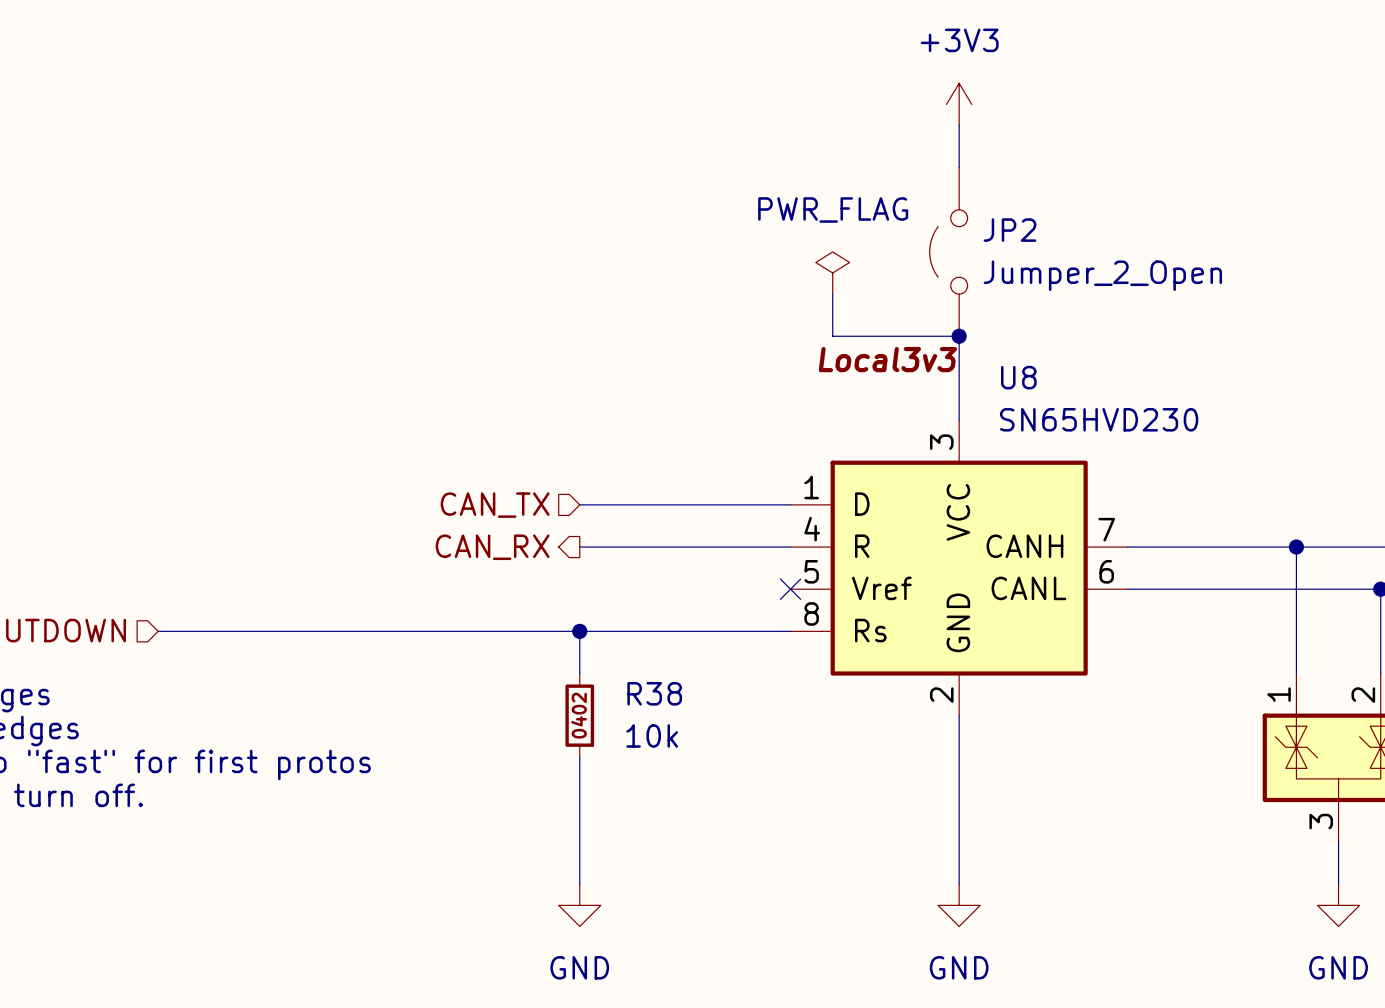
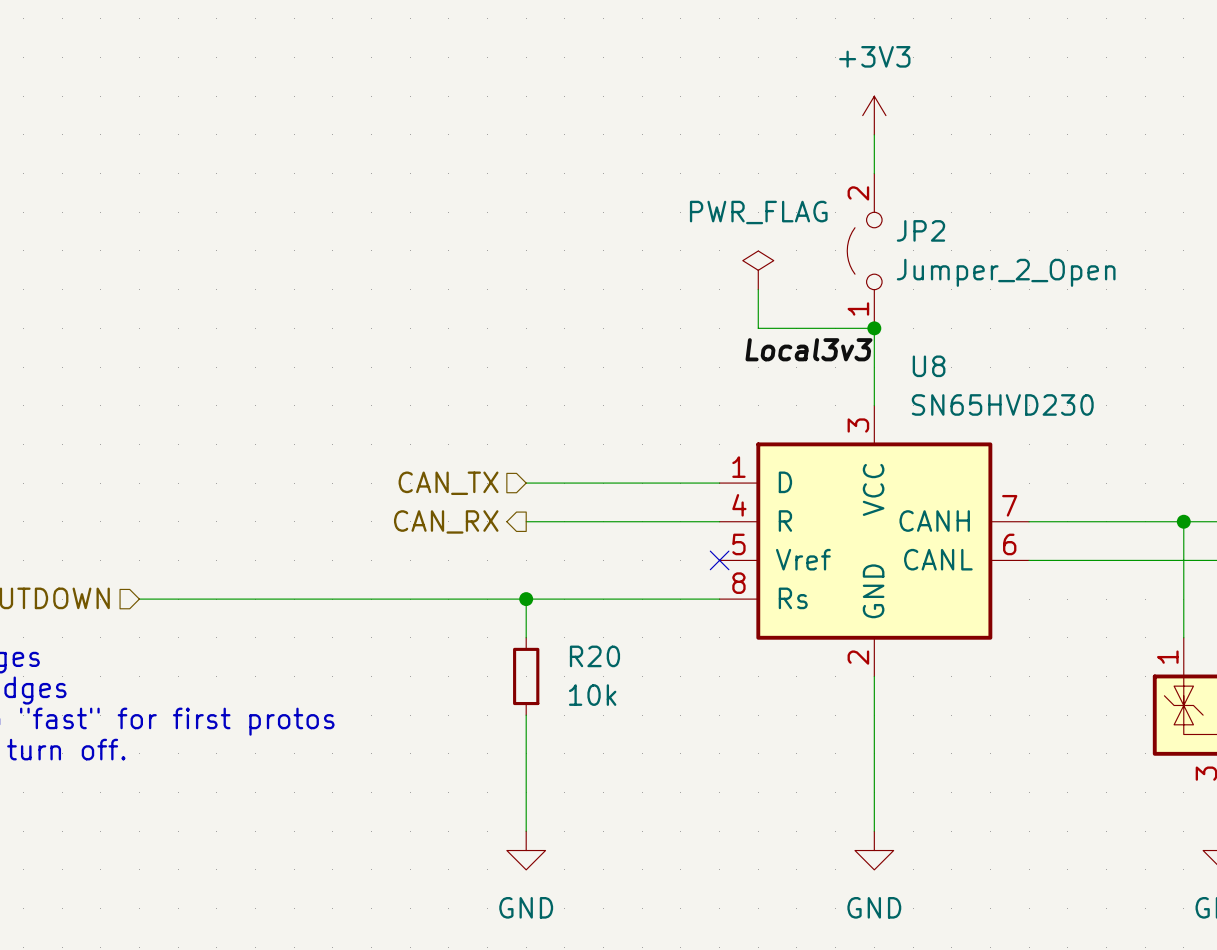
JP2 pin number: none -> 2 (858, 193)
JP2 pin number: none -> 1 (858, 308)
R38 name: R38 (654, 693) -> R20 (594, 656)
R38 text: 0402 (578, 715) -> none

